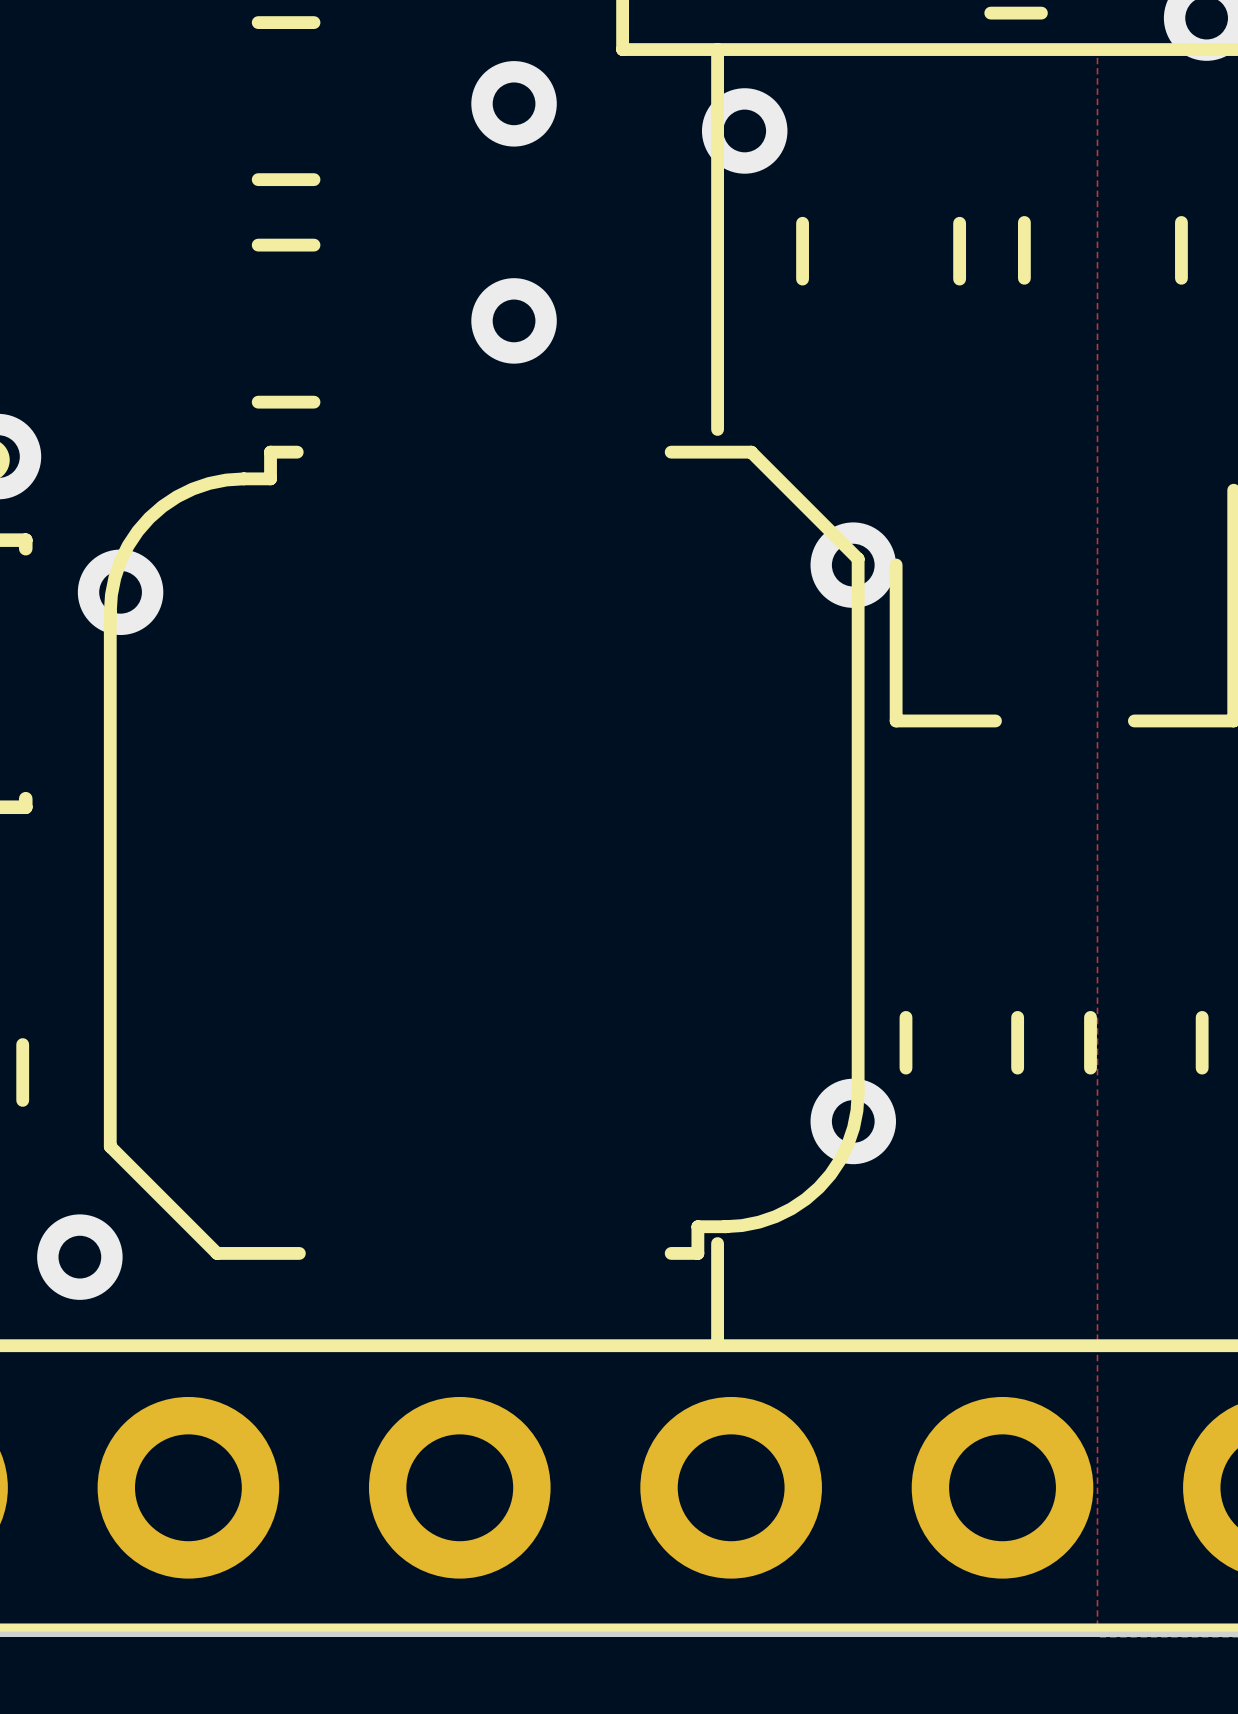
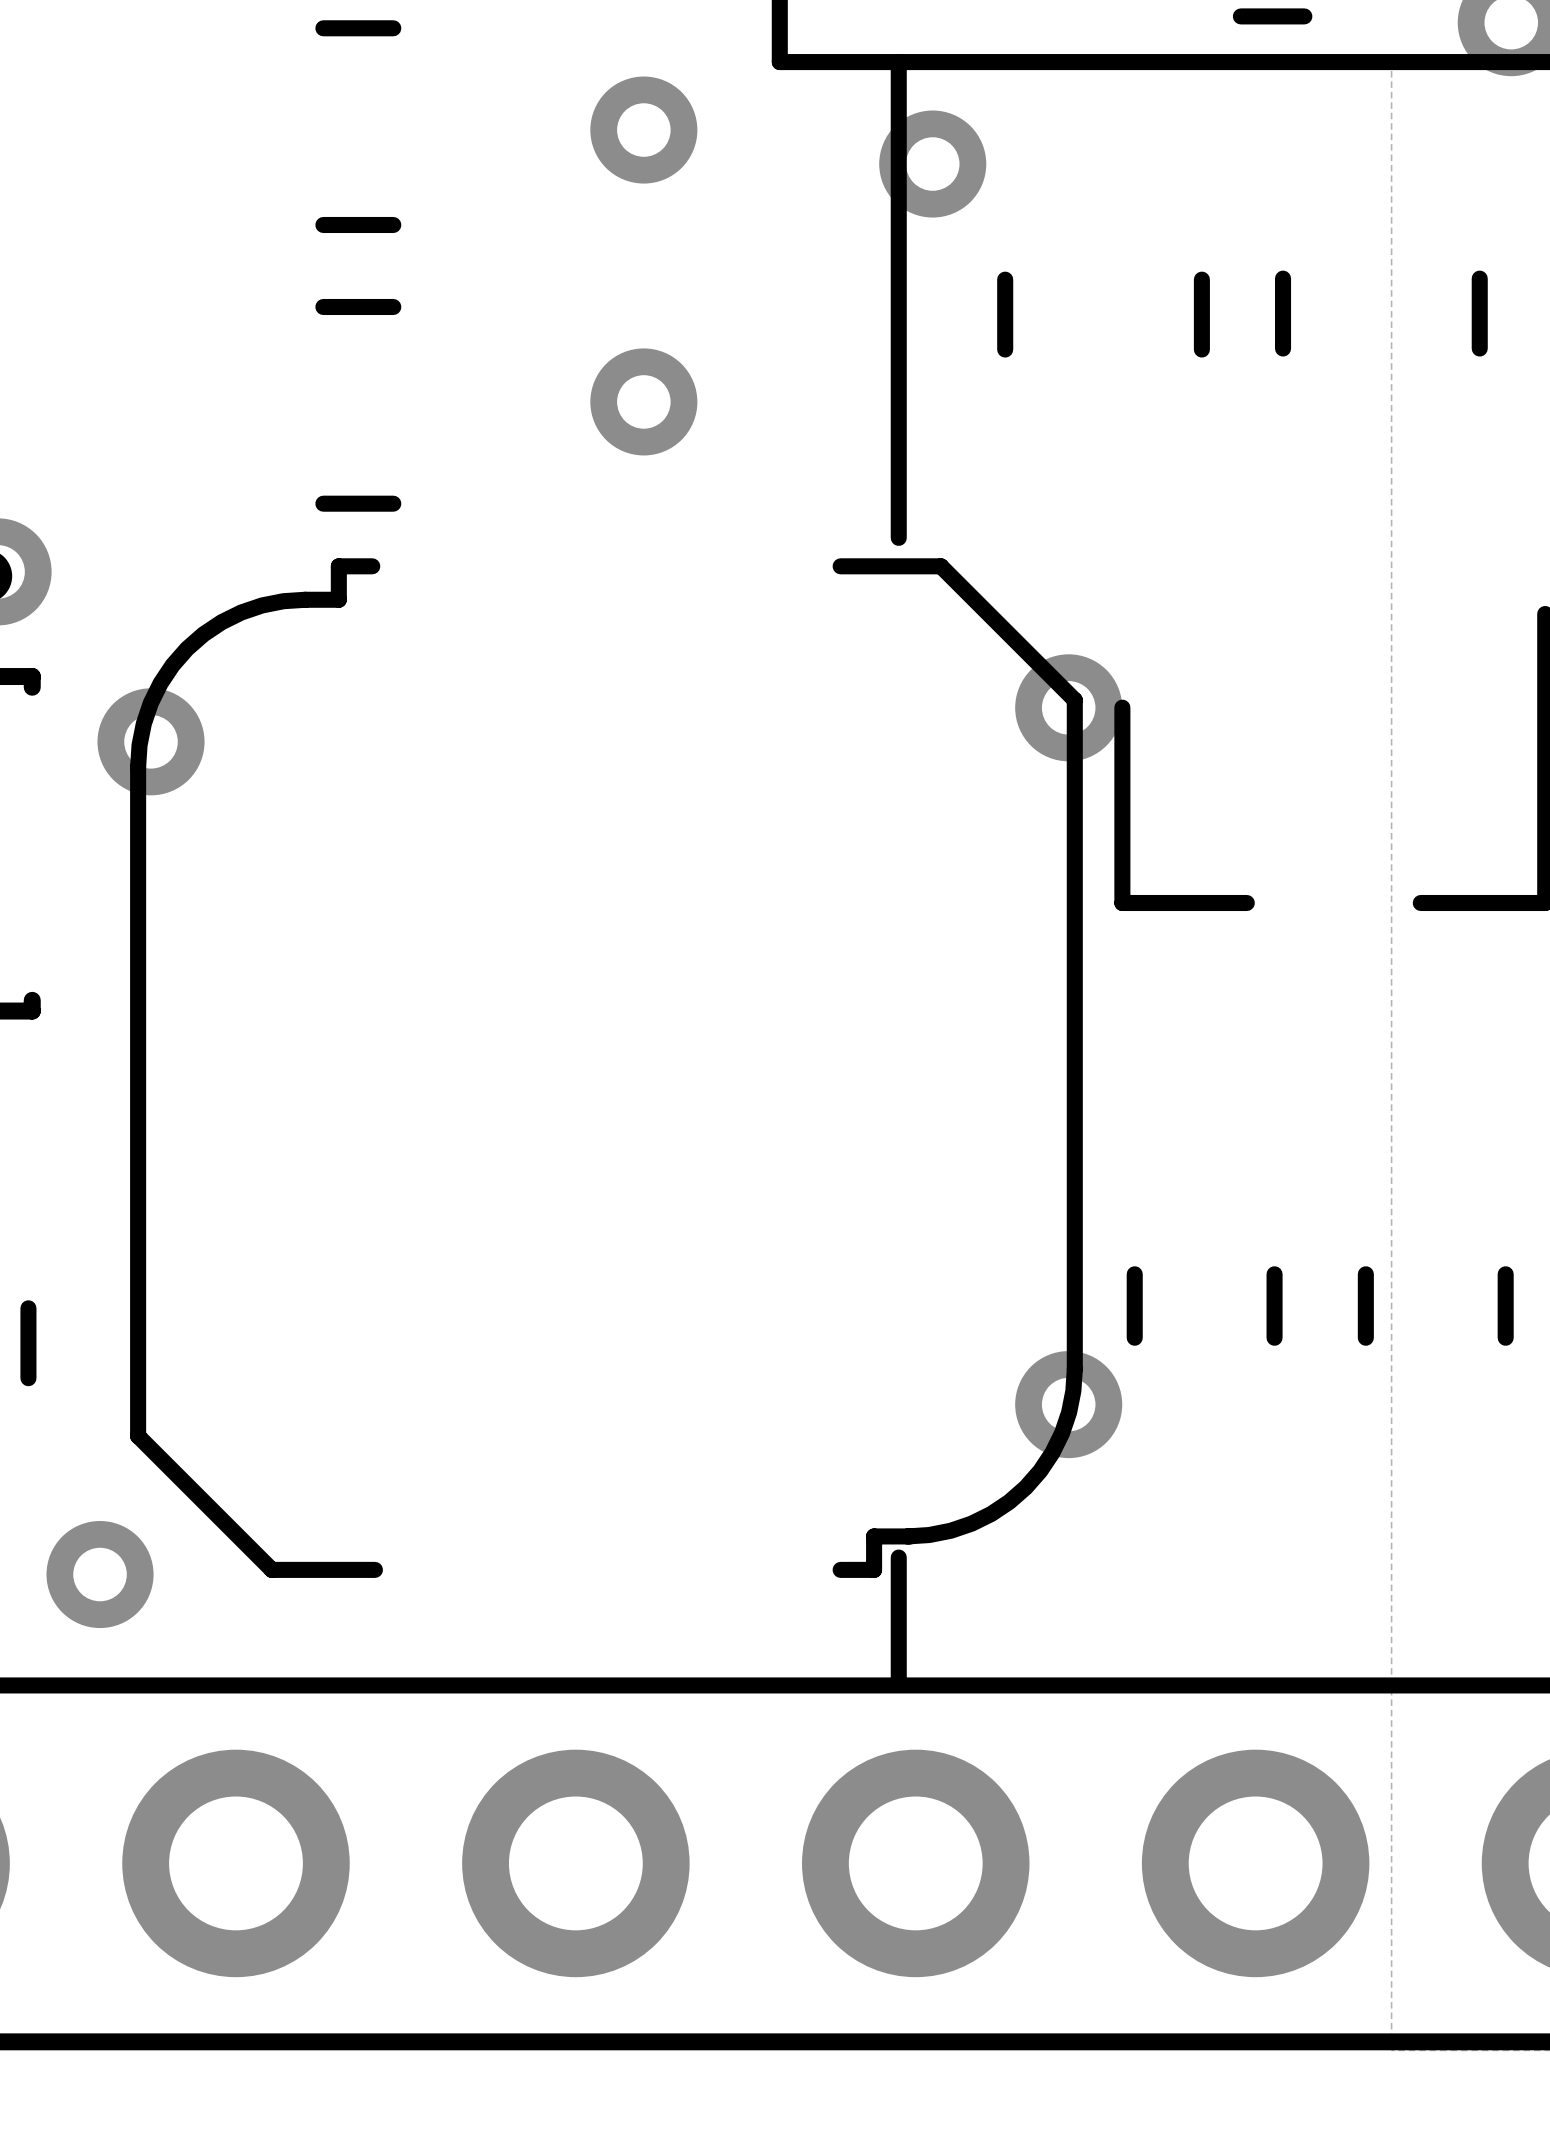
zone outline: (1111, 49) (1097, 49) (1097, 1637) (1111, 1637) -> (1391, 62) (1391, 2050)

